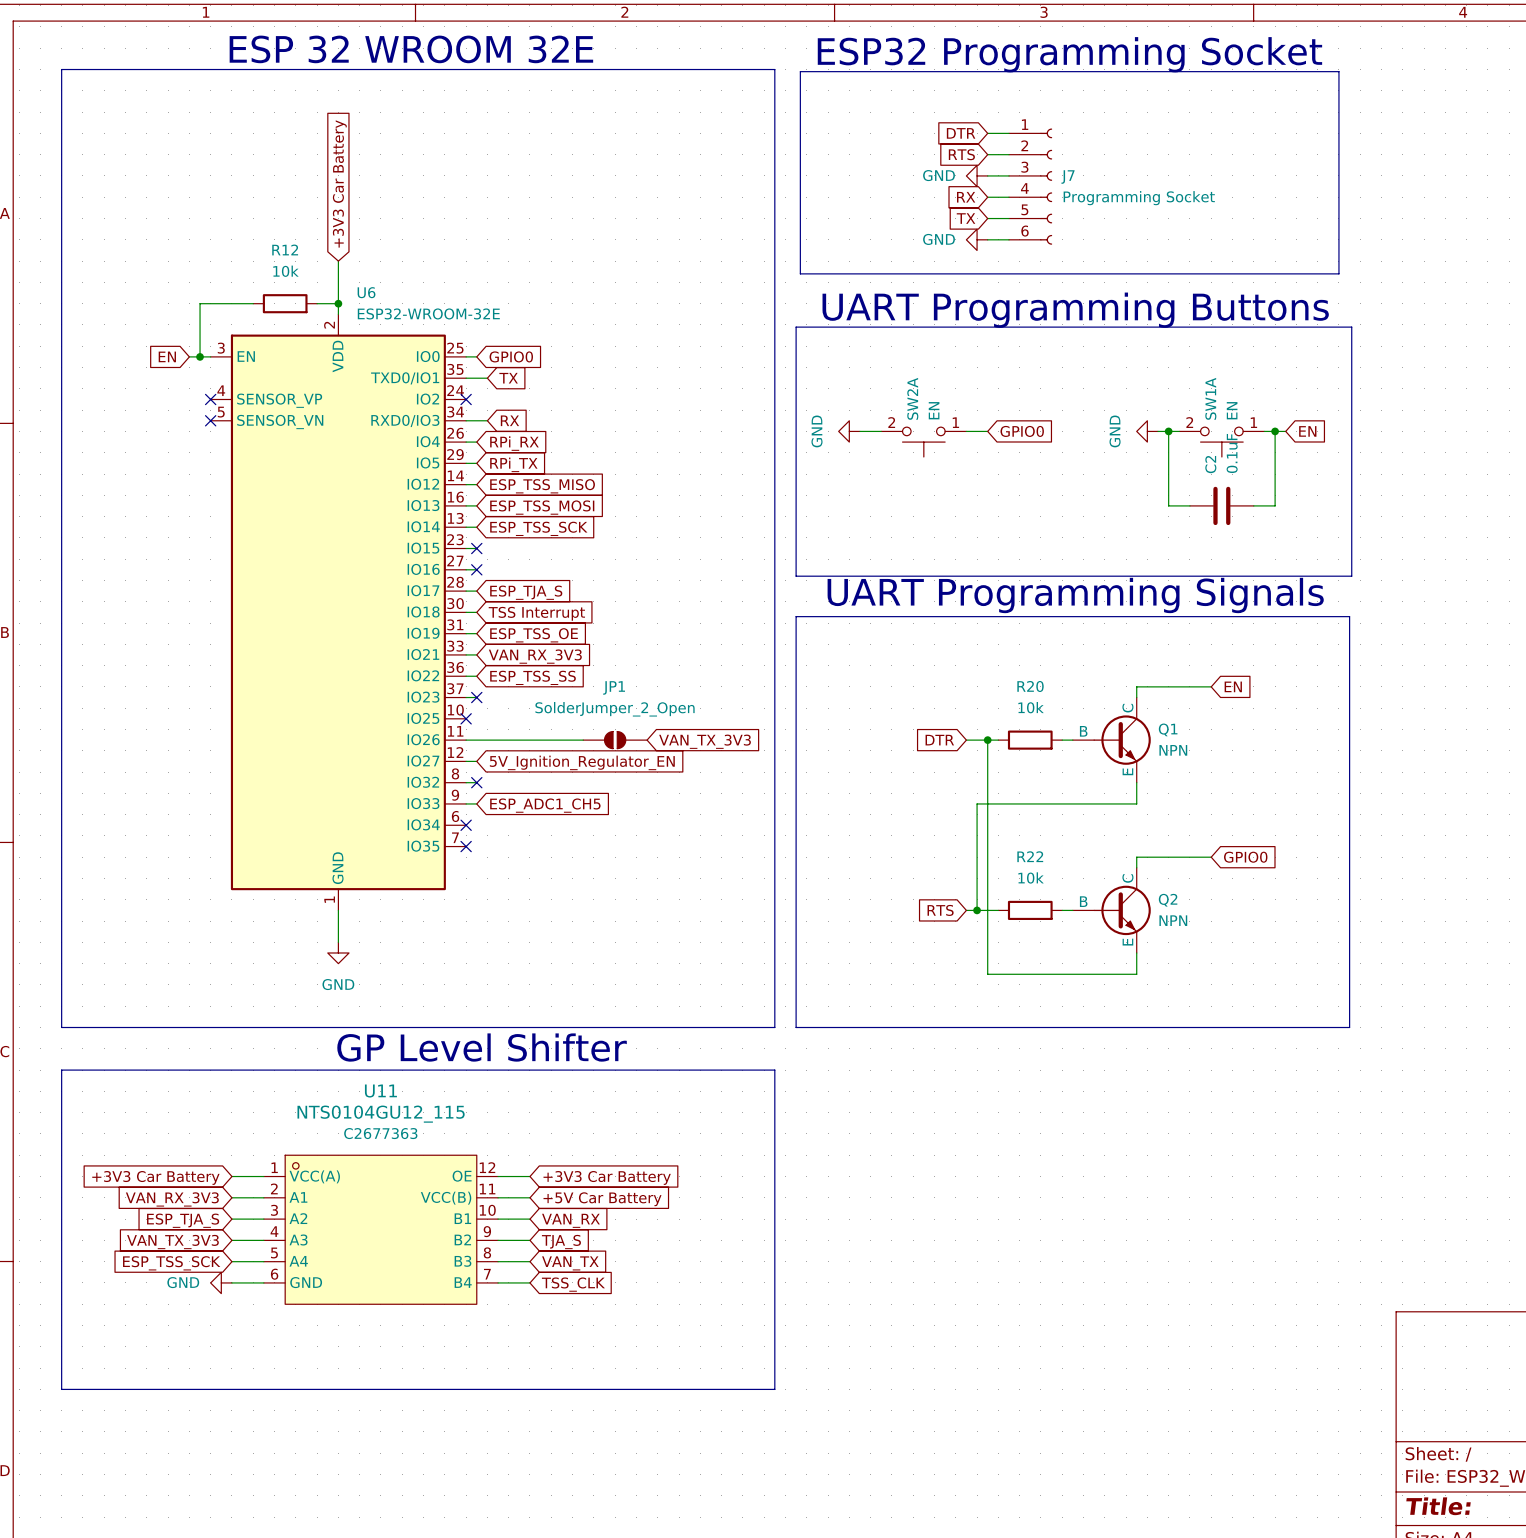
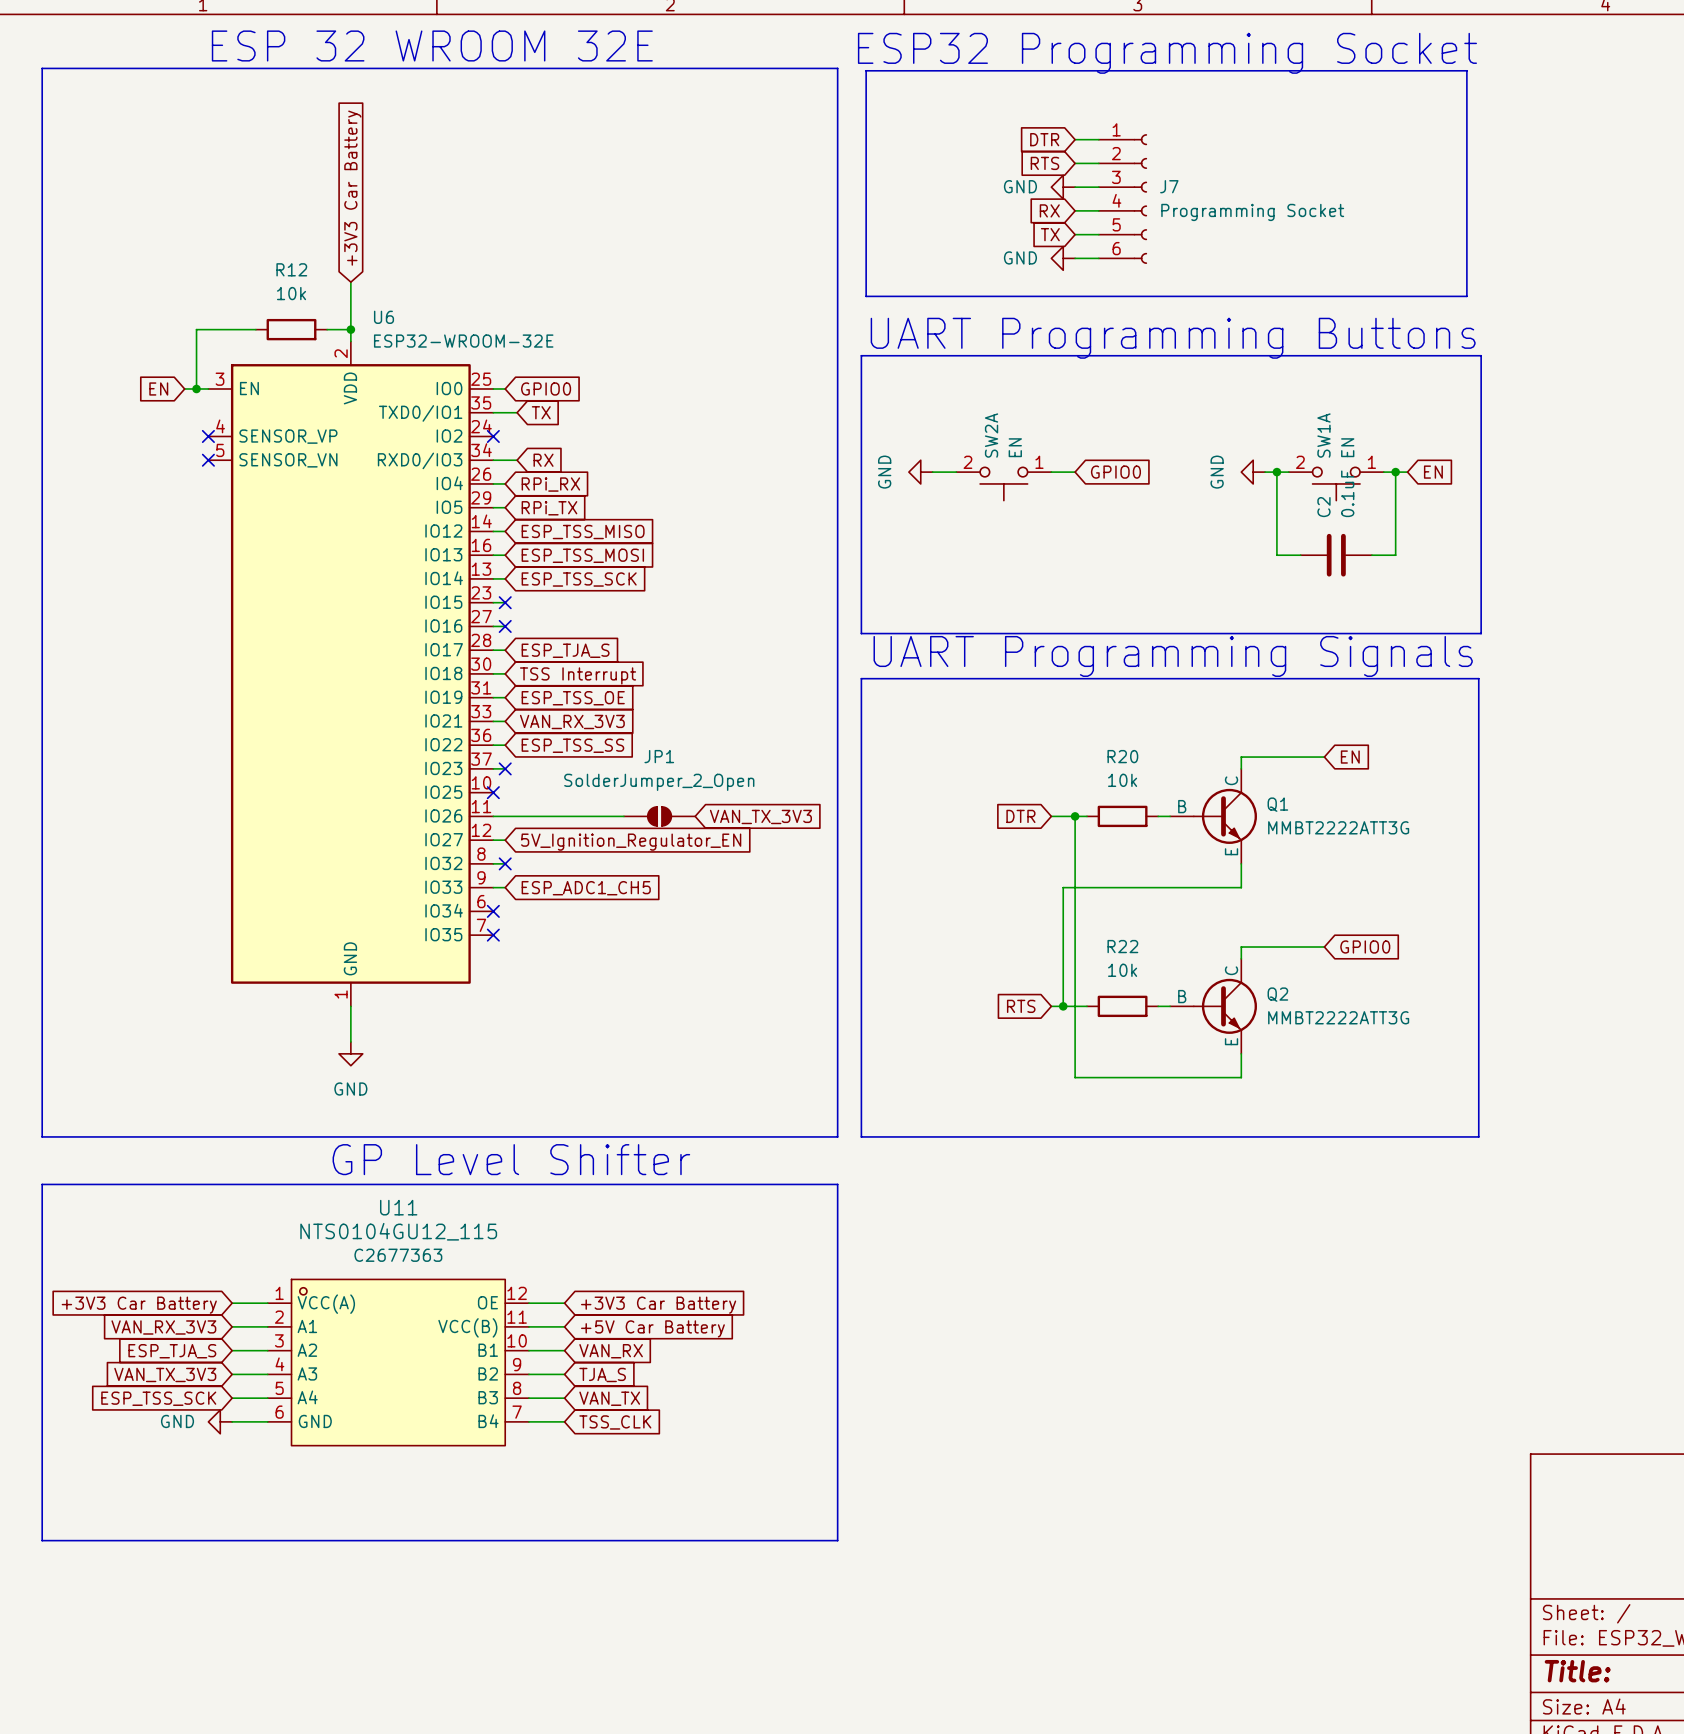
Q1 value: NPN (1173, 750) -> MMBT2222ATT3G (1338, 827)
Q2 value: NPN (1173, 920) -> MMBT2222ATT3G (1338, 1017)

